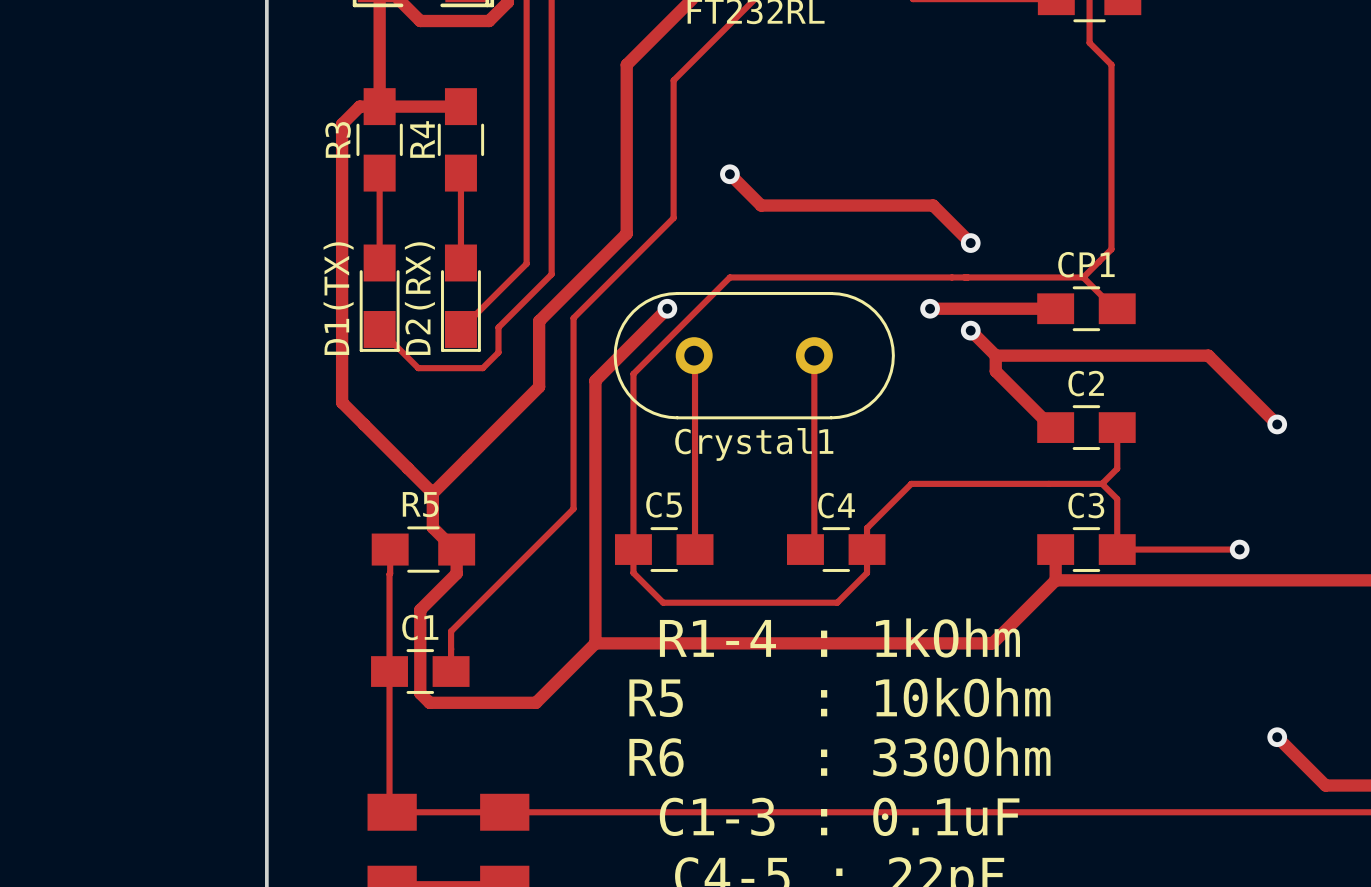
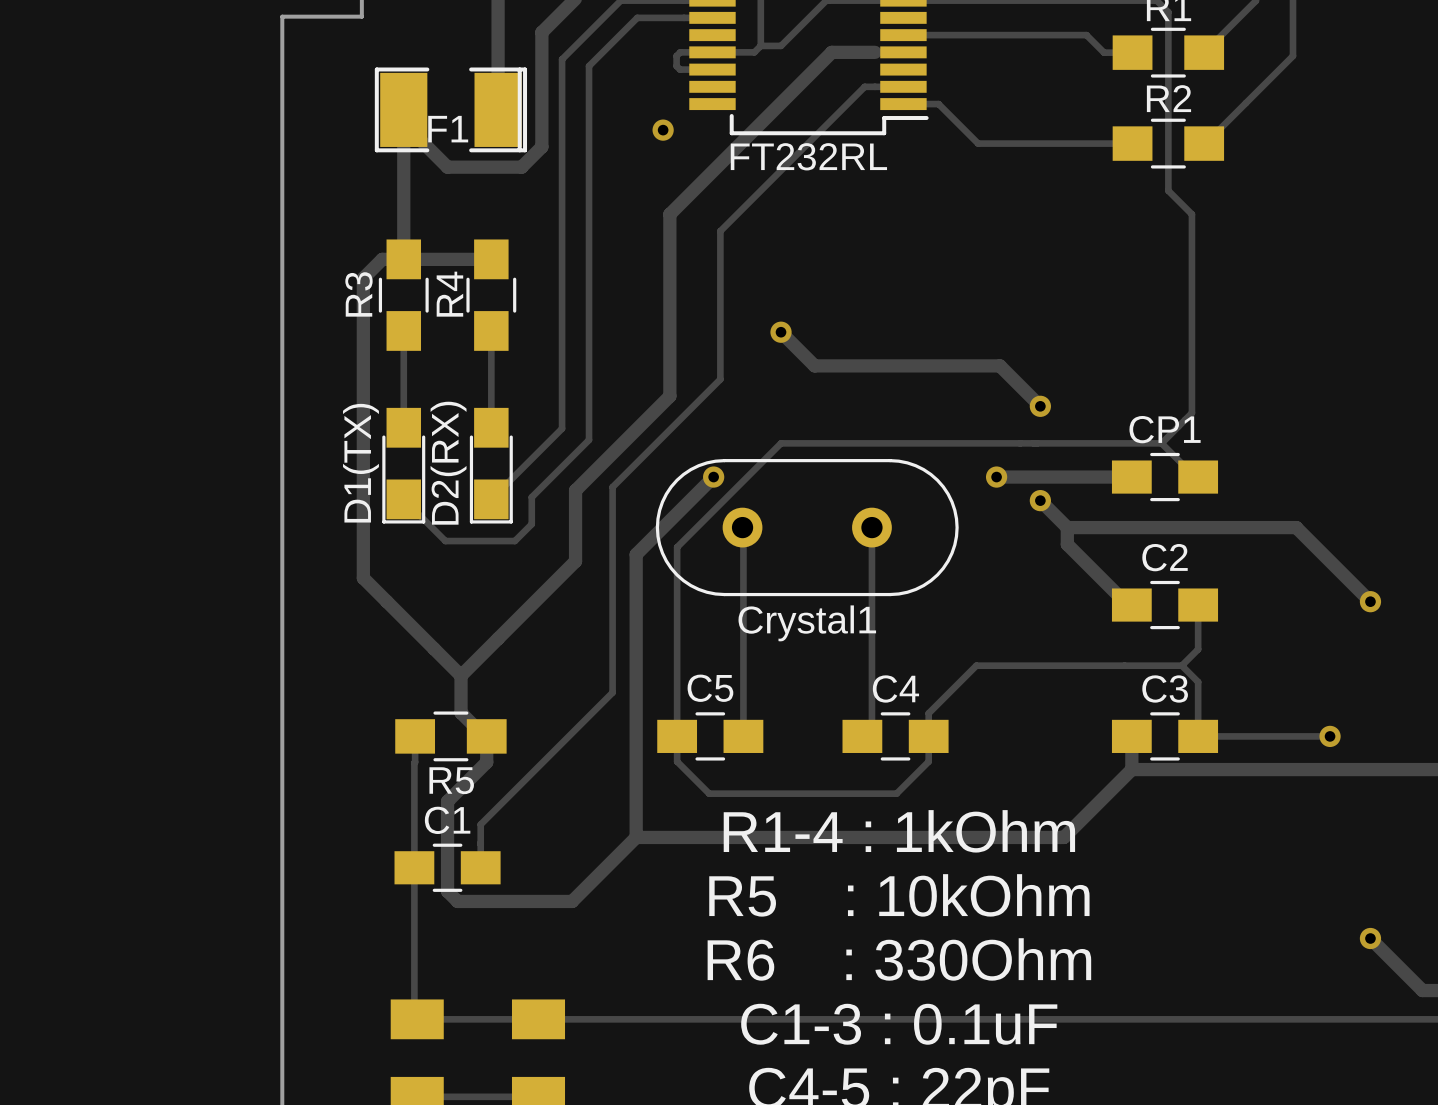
R5 name position: R5 (420, 504) -> R5 (451, 780)

